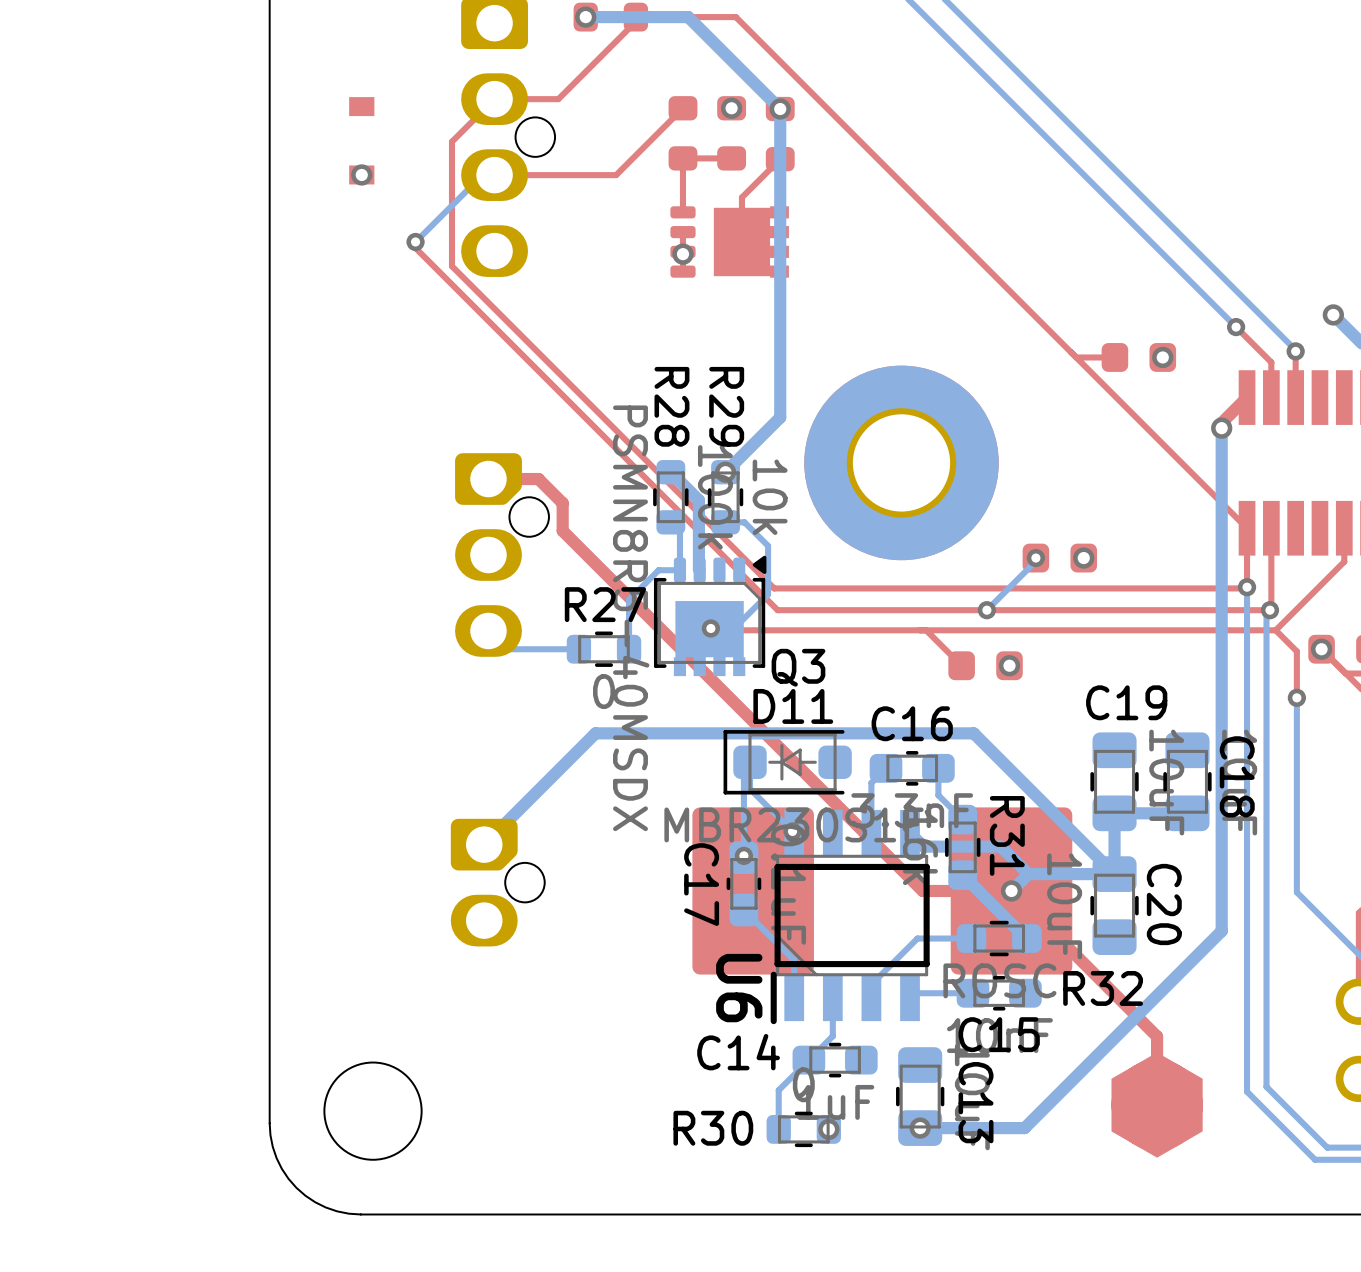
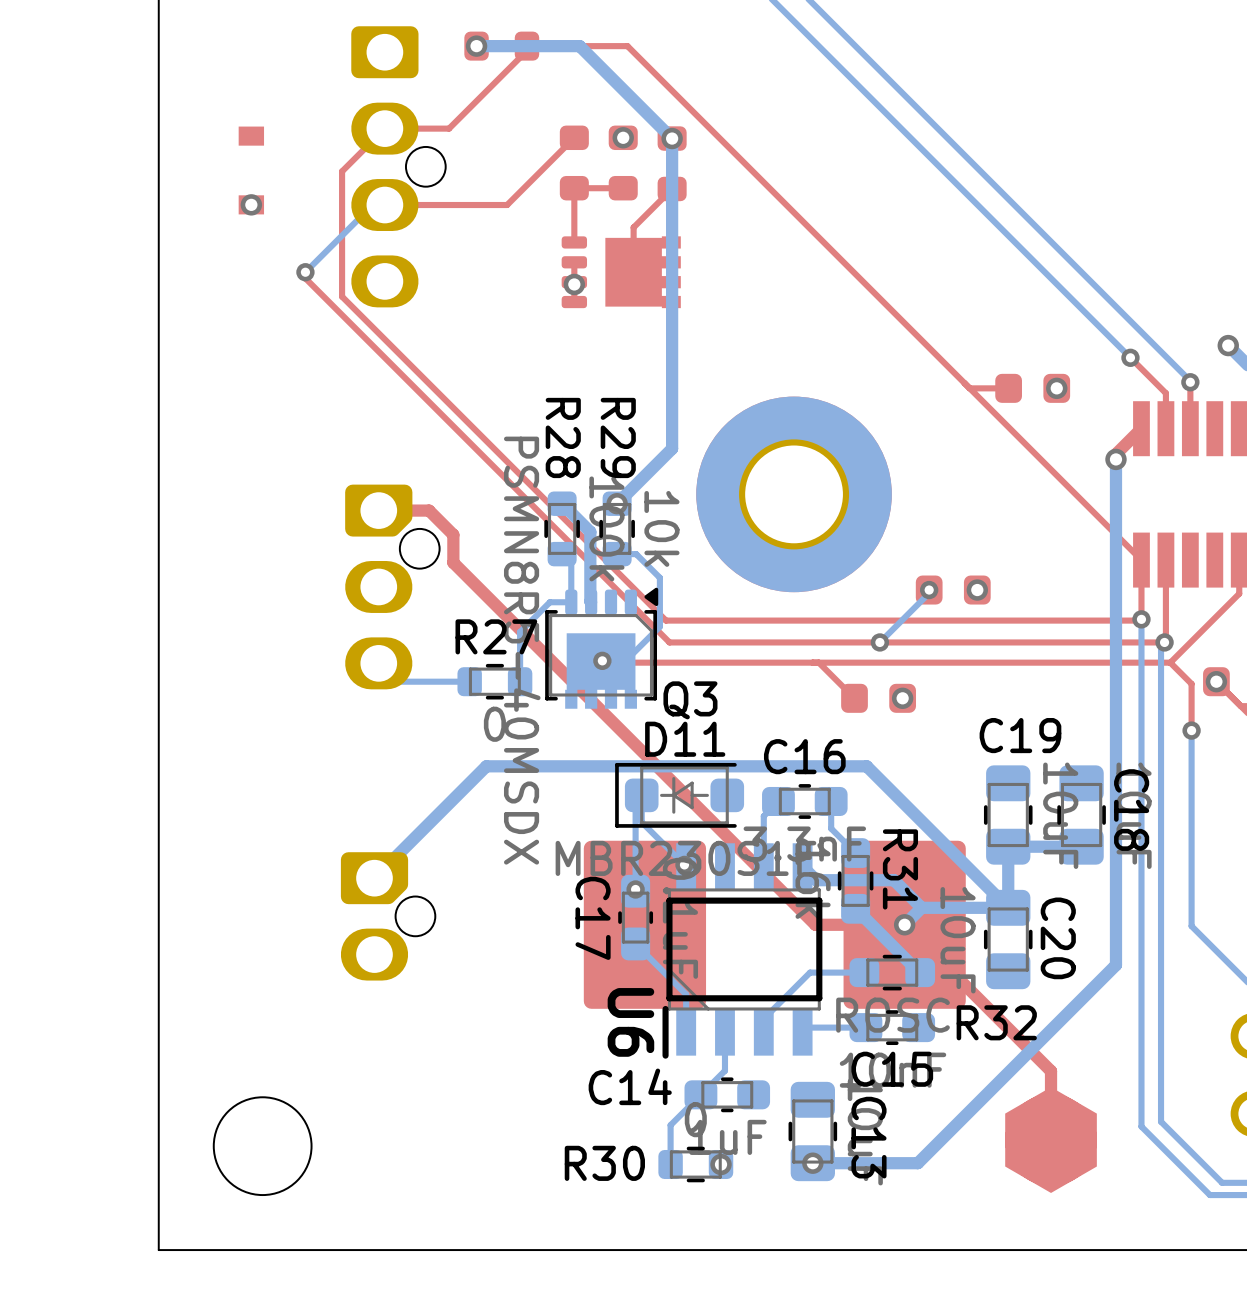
board edge: (269, 1123) (272, 1146) (276, 1158) (281, 1168) (296, 1187) (305, 1195) (325, 1207) (337, 1211) (360, 1214) -> (158, 1158) (158, 1250) (250, 1250)

